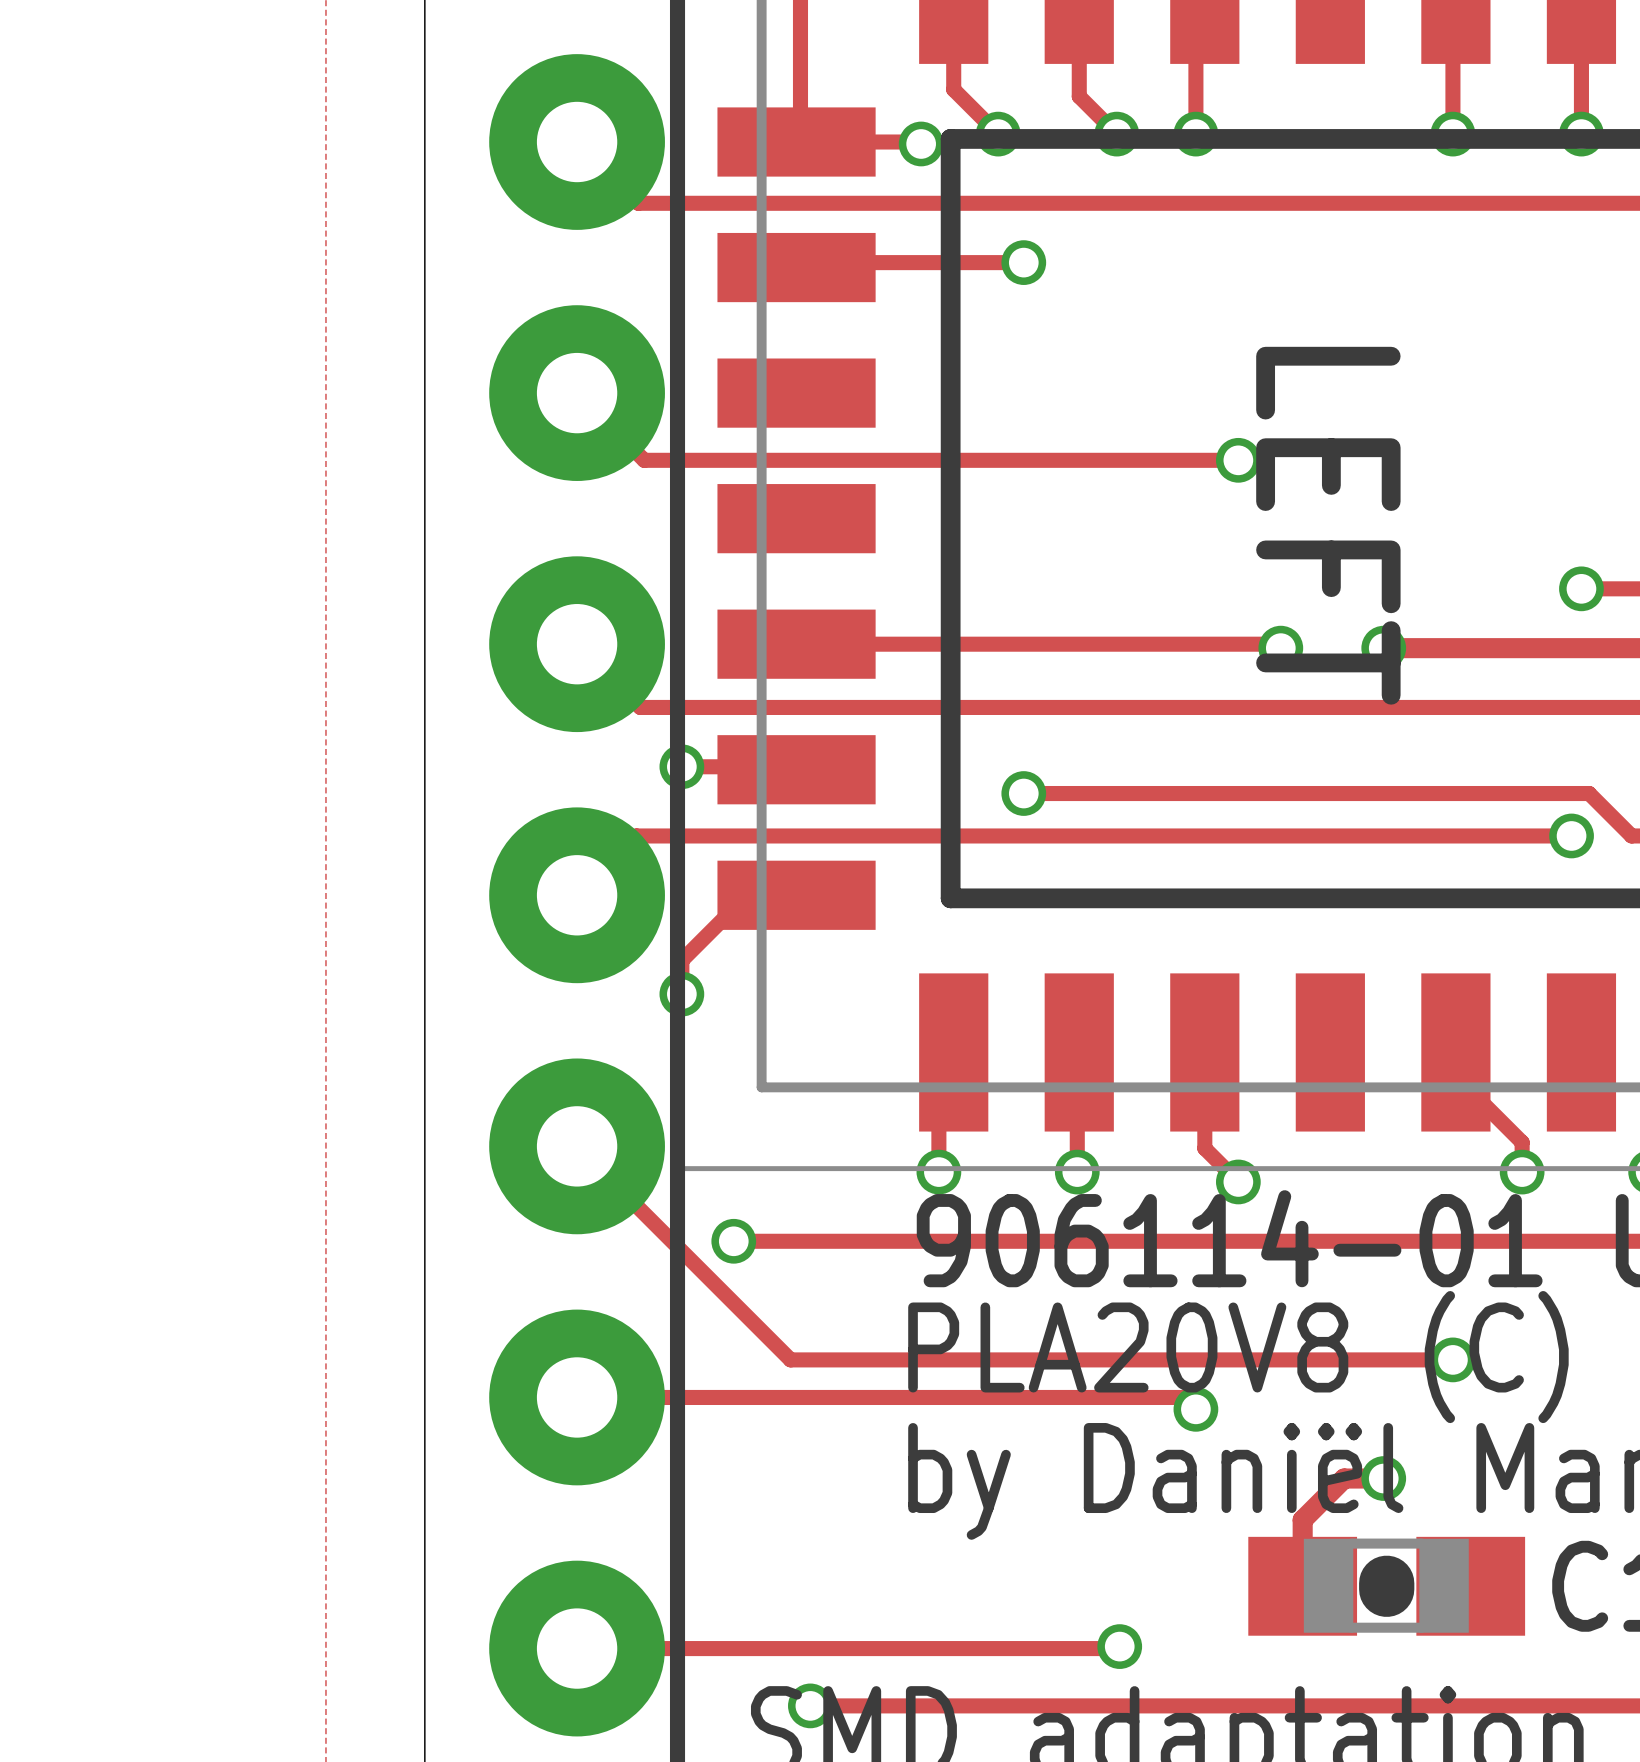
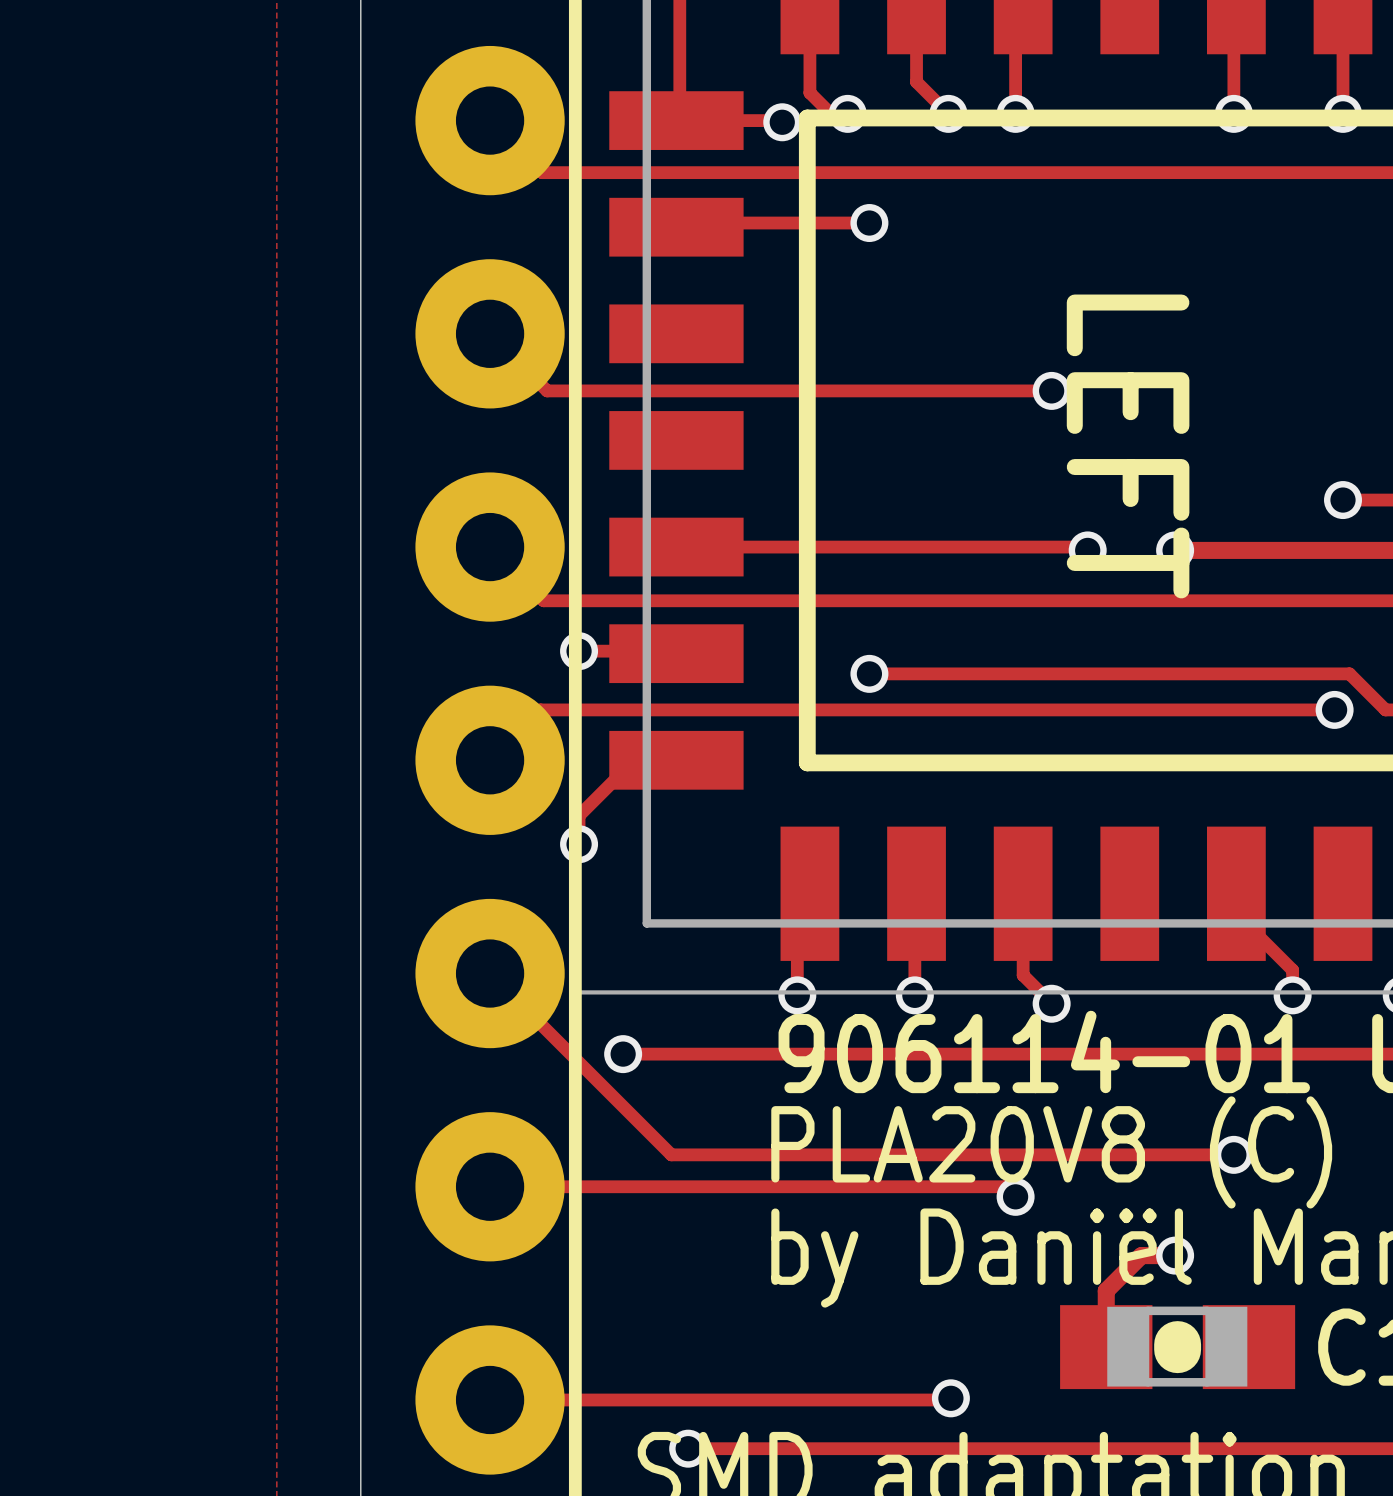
track: (953, 89) (998, 134) -> (809, 76) (809, 92) (830, 113)

